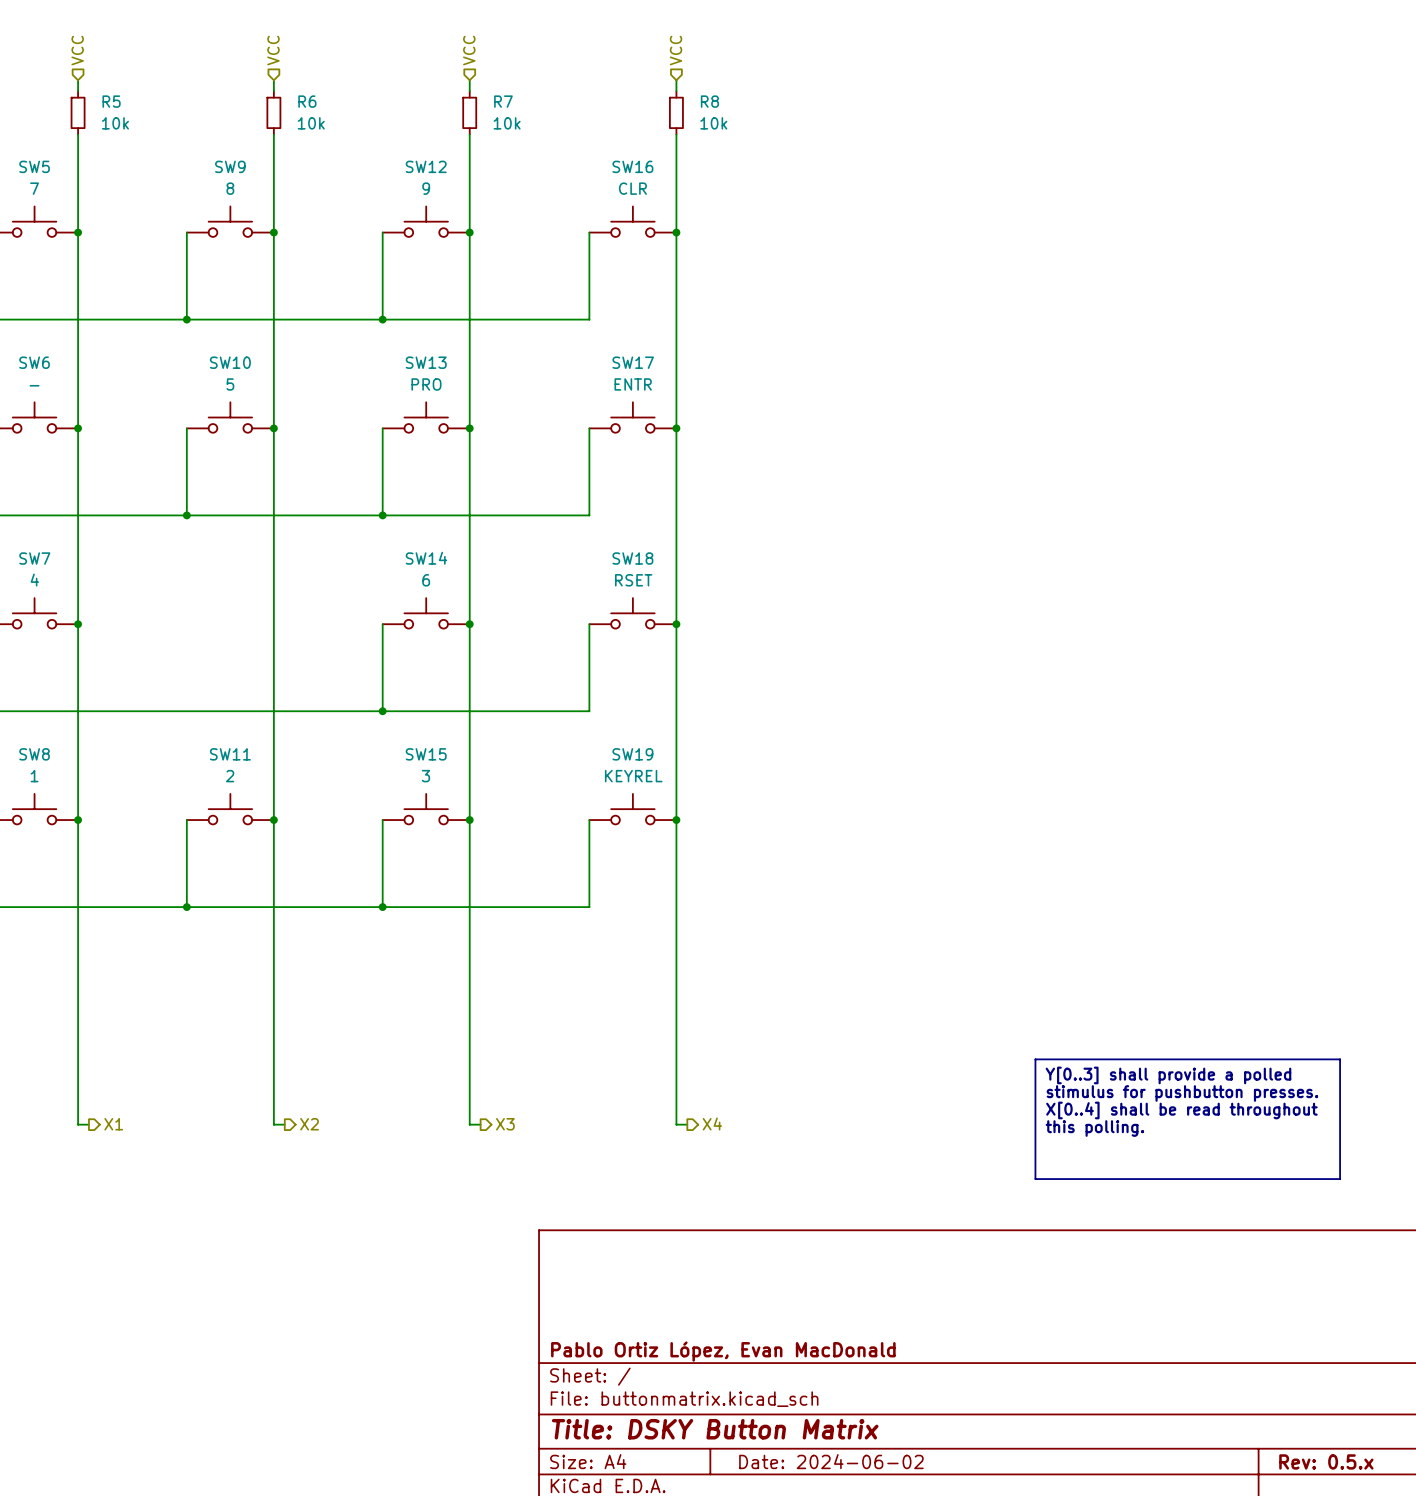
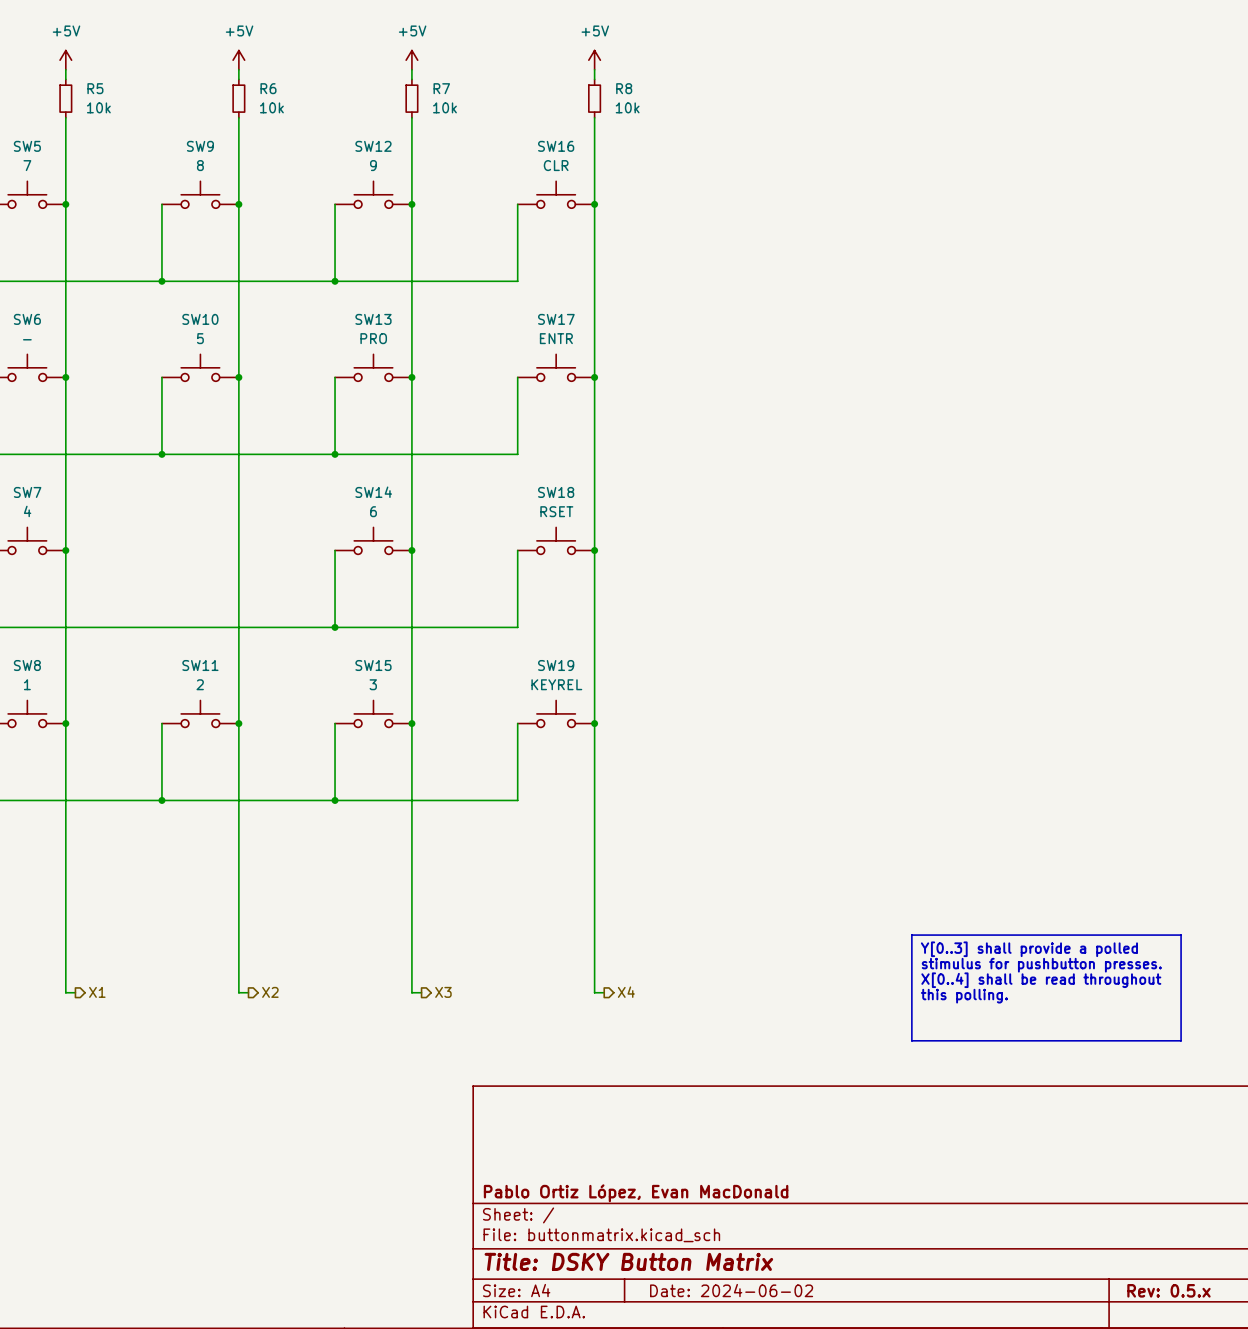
hierarchical label: VCC (77, 50) -> none
hierarchical label: VCC (273, 50) -> none
hierarchical label: VCC (469, 50) -> none
hierarchical label: VCC (676, 50) -> none
power symbol: none -> +5V (65, 60)
power symbol: none -> +5V (238, 60)
power symbol: none -> +5V (411, 60)
power symbol: none -> +5V (594, 60)

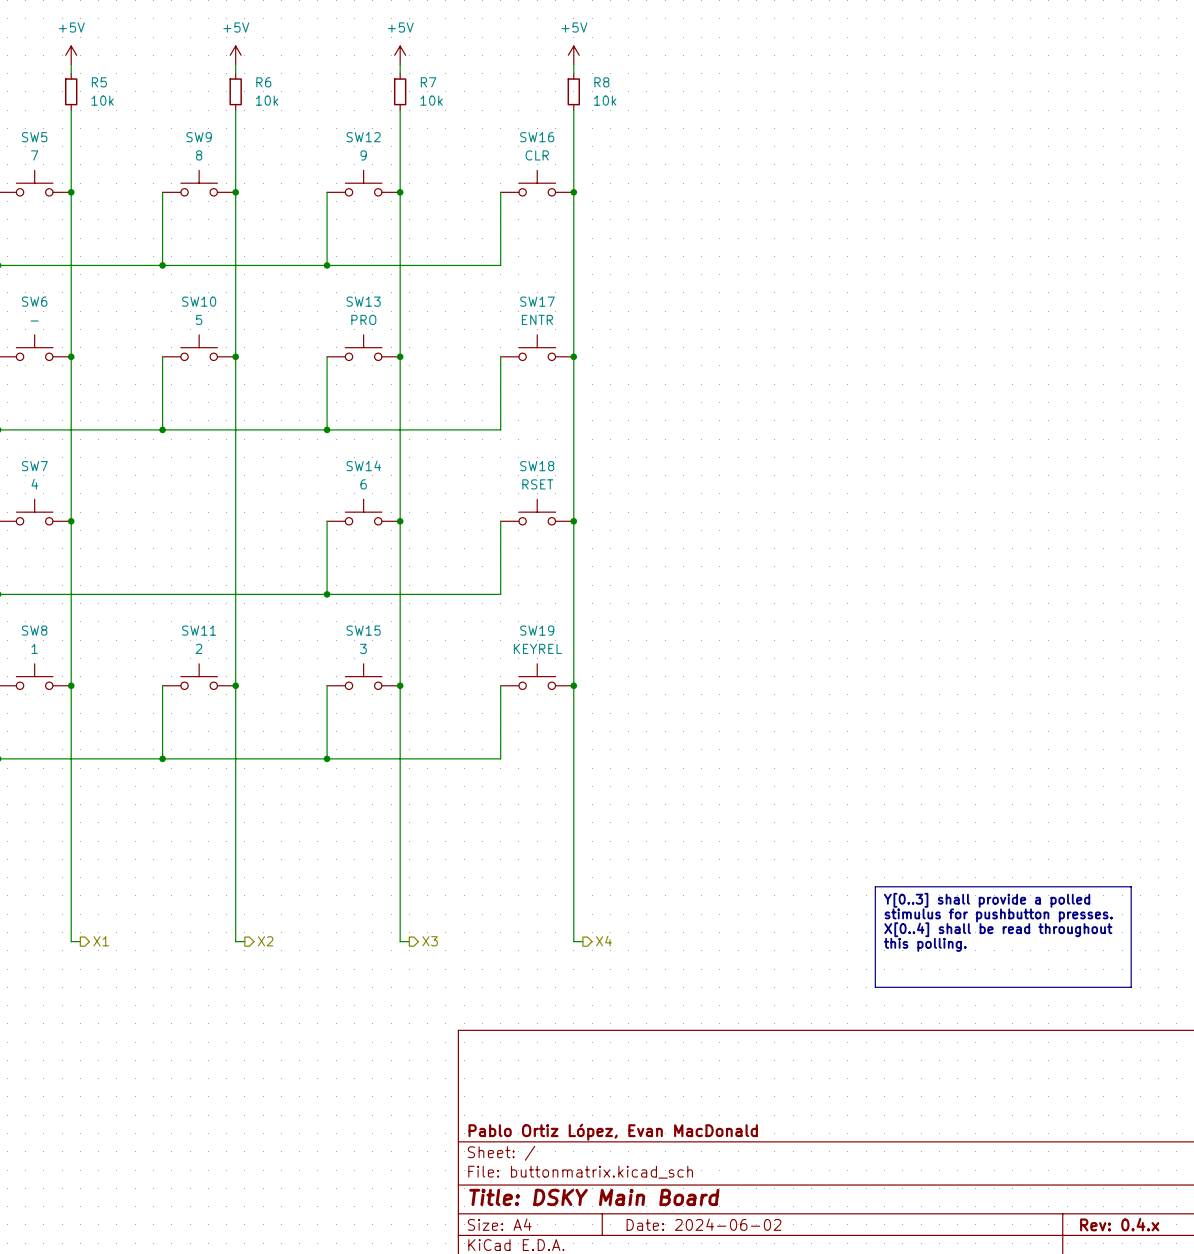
title block: Title: DSKY Button Matrix (628, 1261) -> Title: DSKY Main Board (594, 1197)
title block: Rev: 0.5.x (1168, 1290) -> Rev: 0.4.x (1119, 1224)

